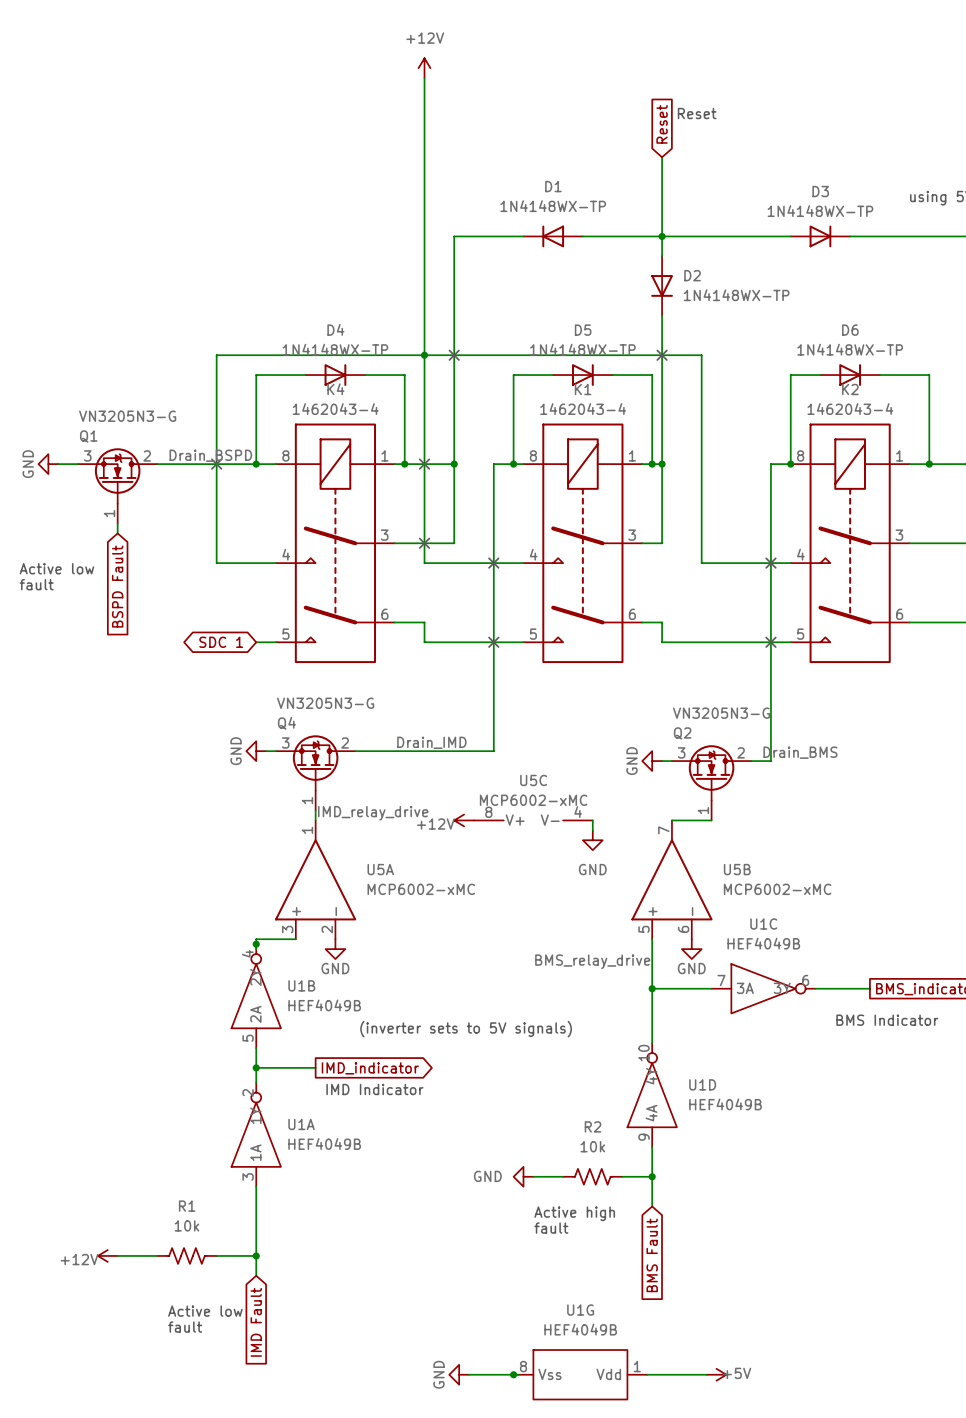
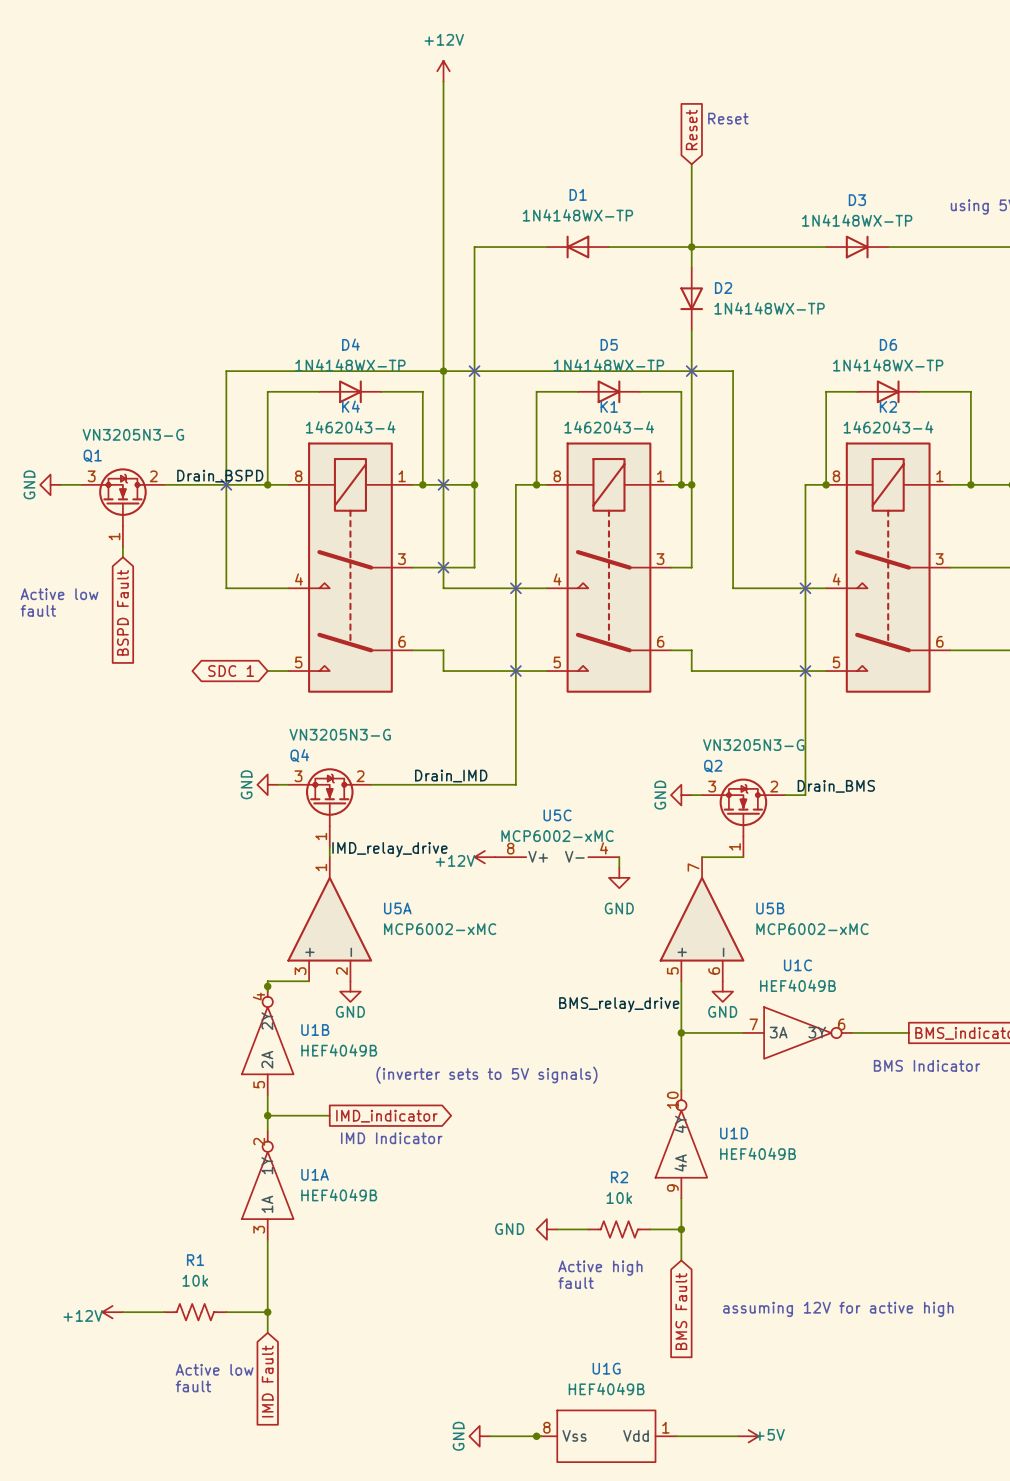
text: none -> assuming 12V for active high (838, 1309)

